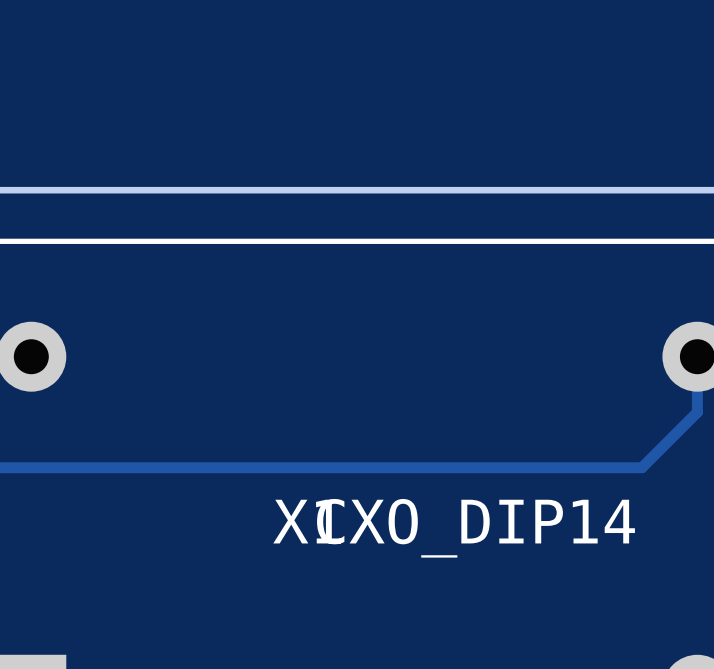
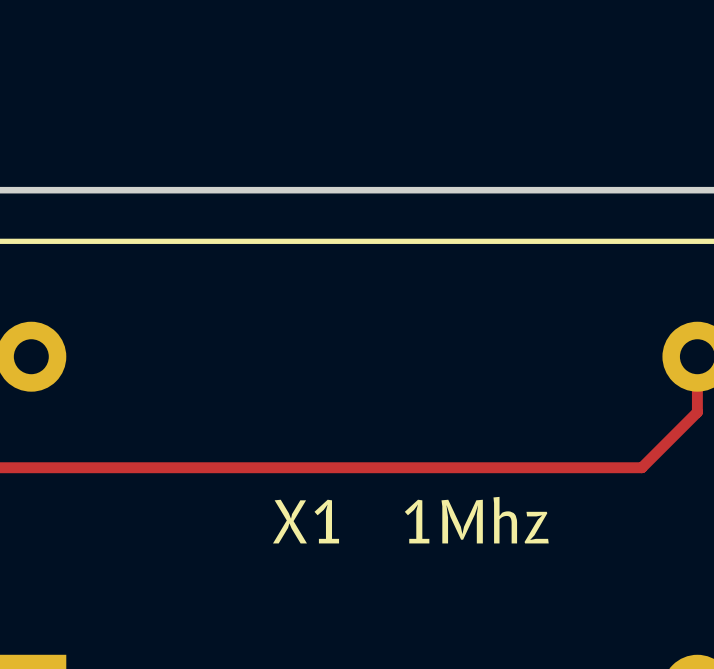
X1 value: CXO_DIP14 (475, 528) -> 1Mhz (476, 520)

